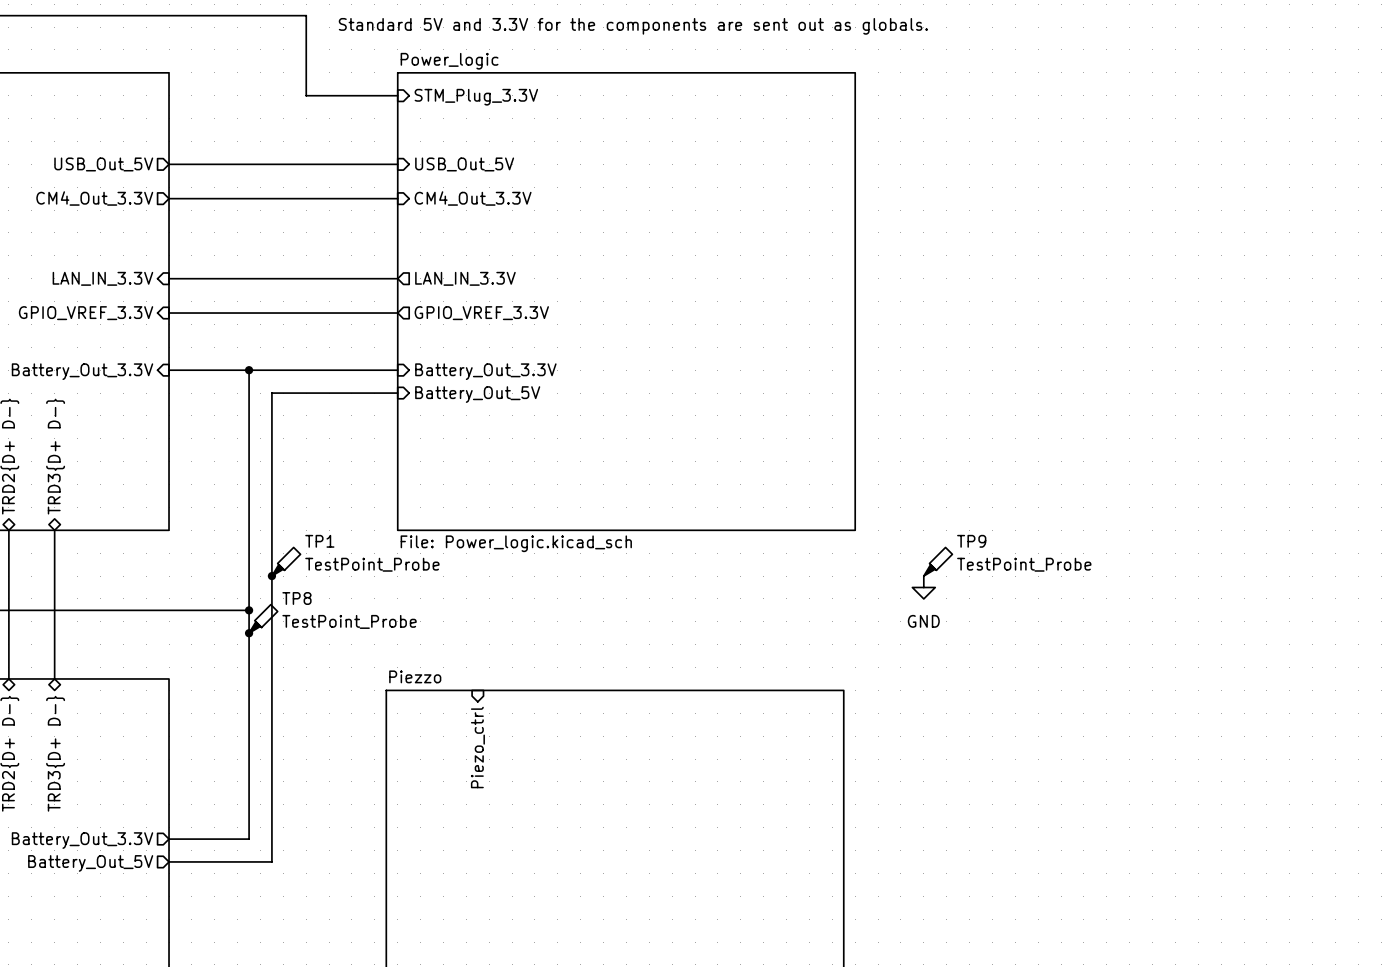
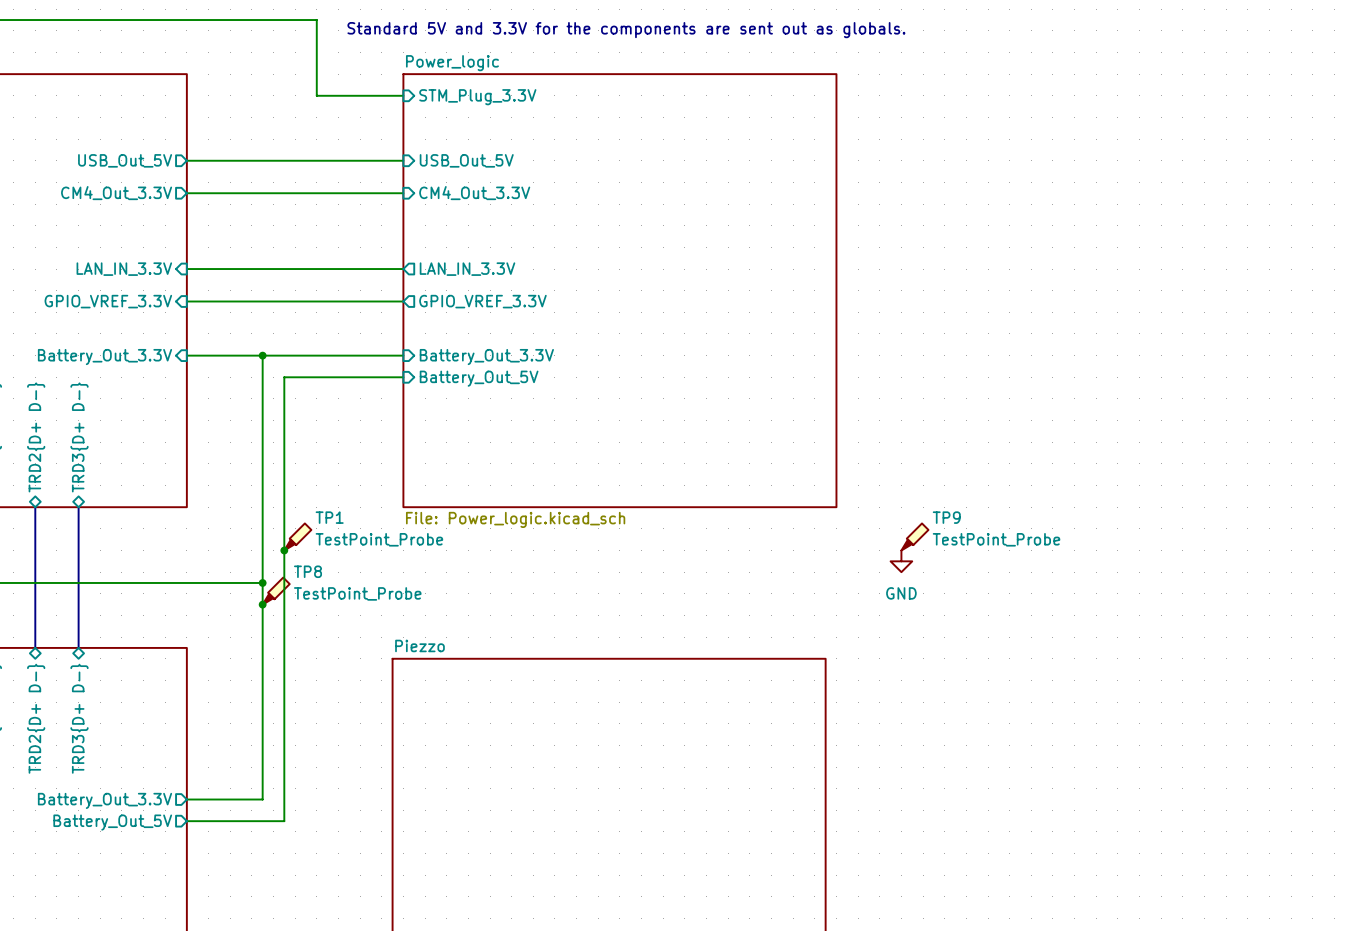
sheet pin: Piezo_ctrl (477, 747) -> none

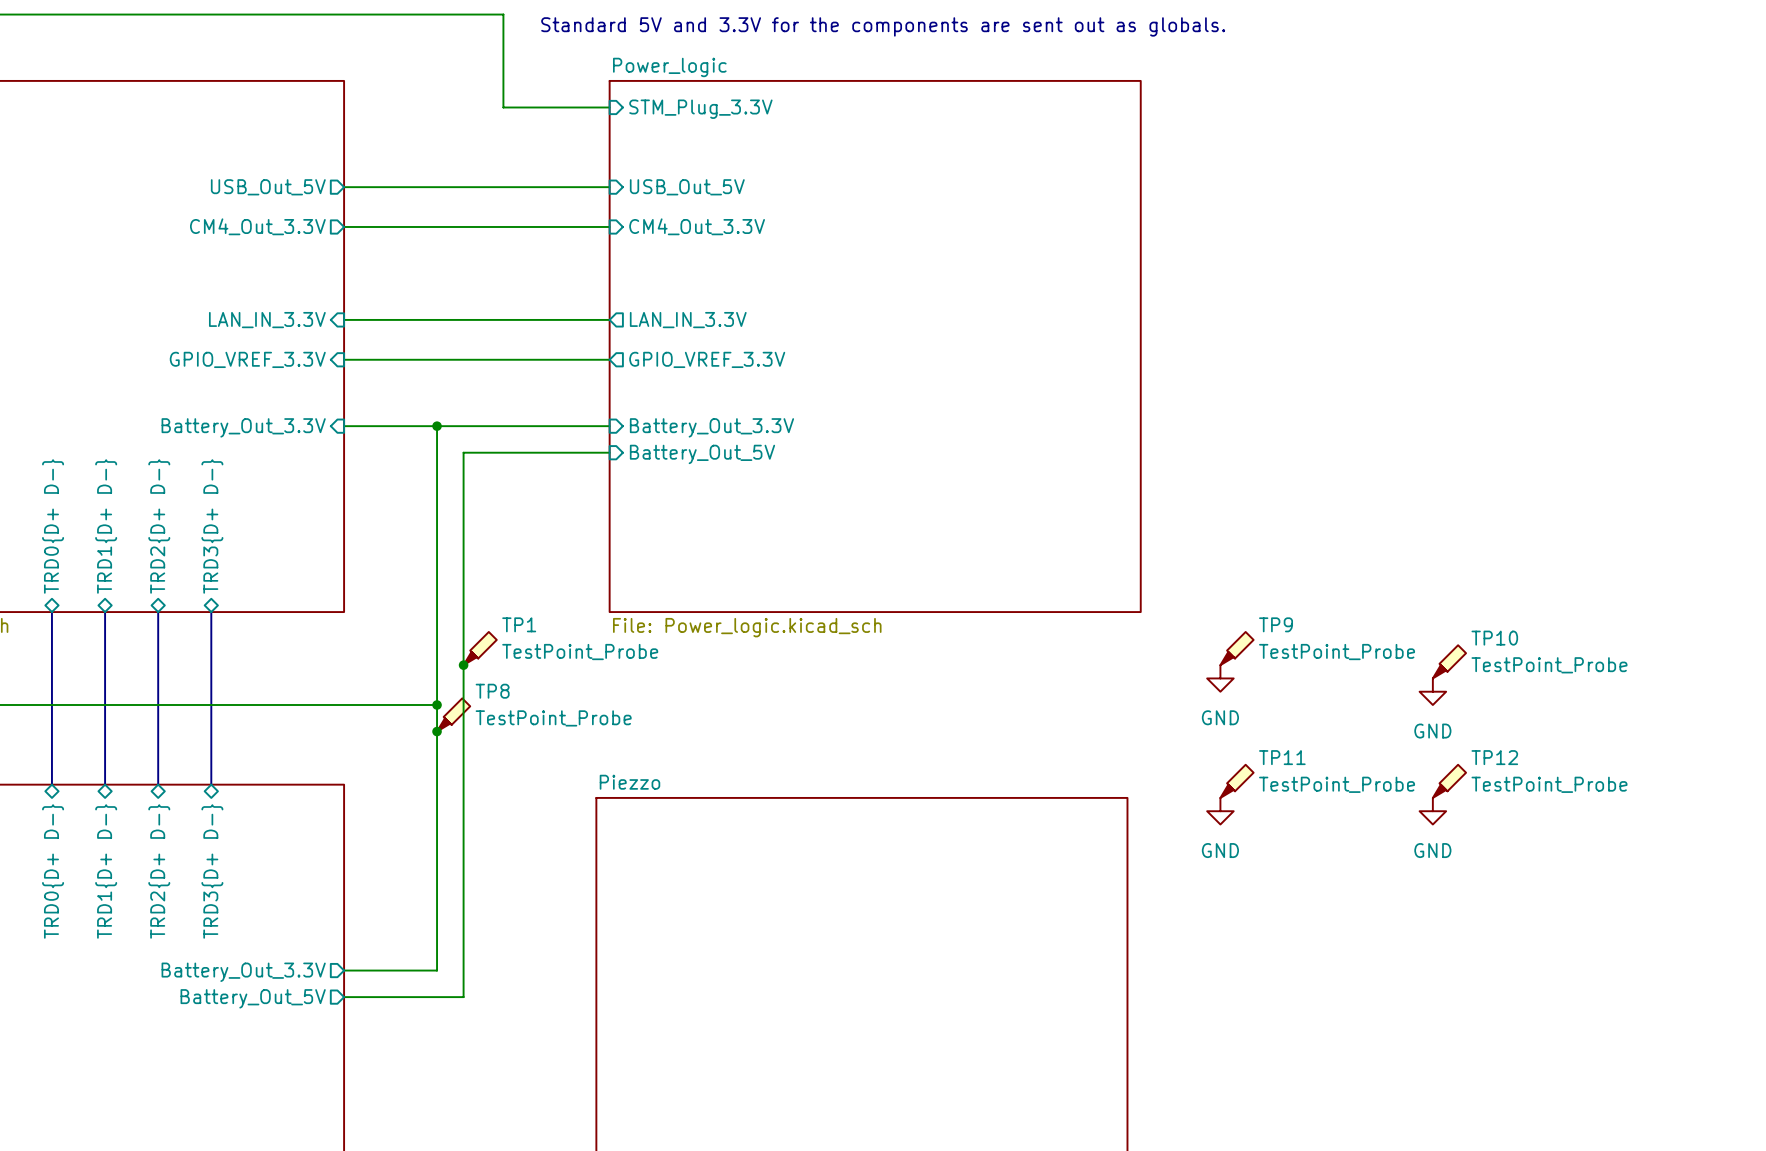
TP10: none -> TestPoint_Probe (1449, 661)
power symbol: none -> GND (1432, 691)
TP11: none -> TestPoint_Probe (1237, 781)
TP12: none -> TestPoint_Probe (1449, 781)
power symbol: none -> GND (1220, 811)
power symbol: none -> GND (1432, 811)

